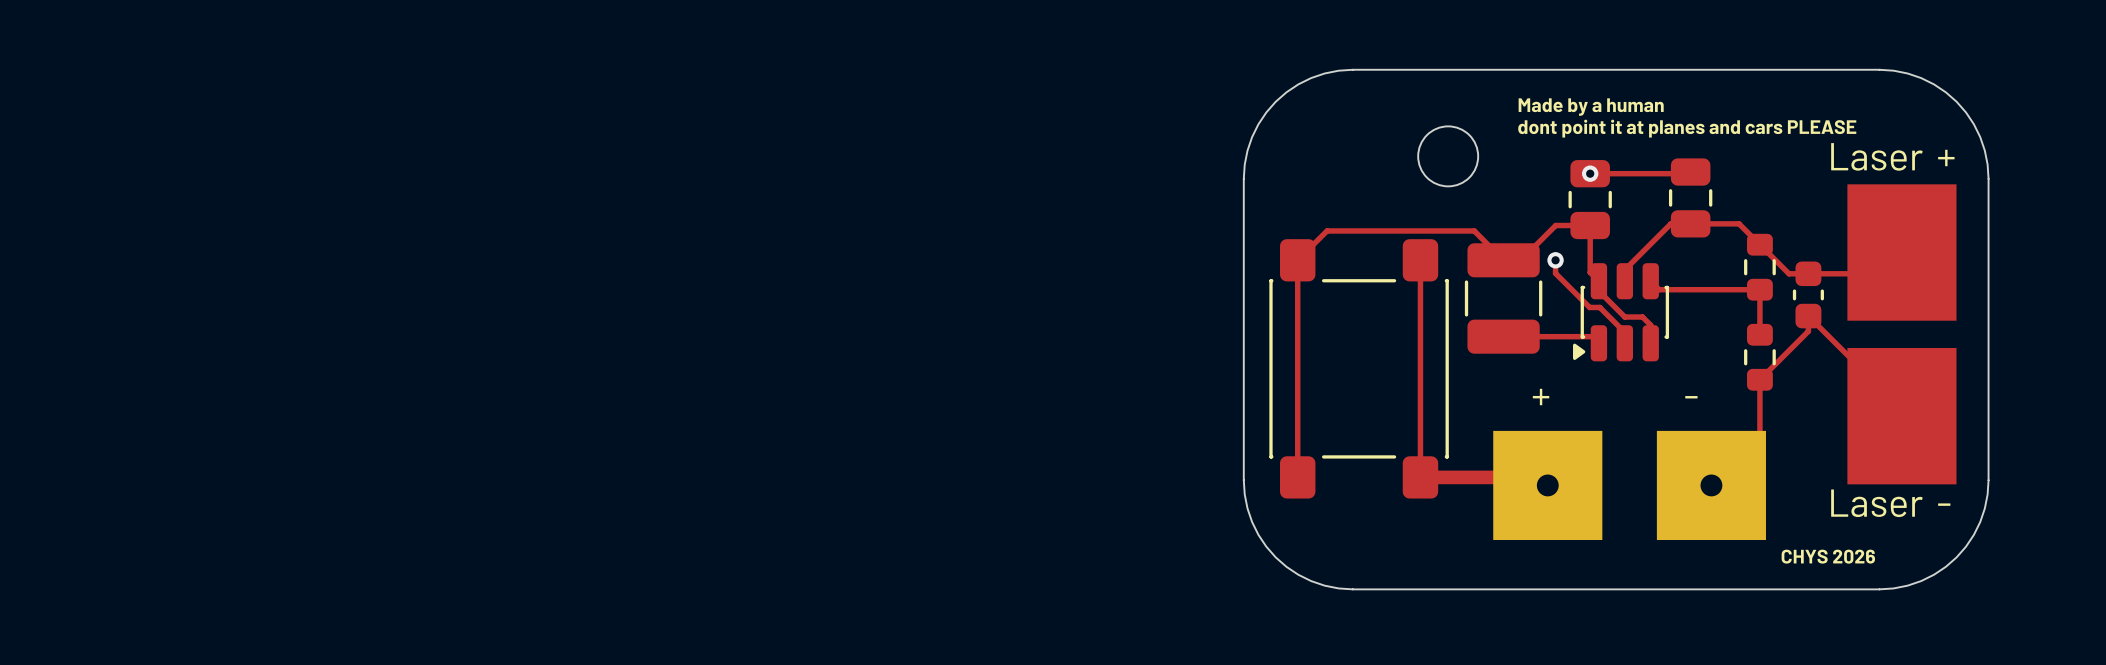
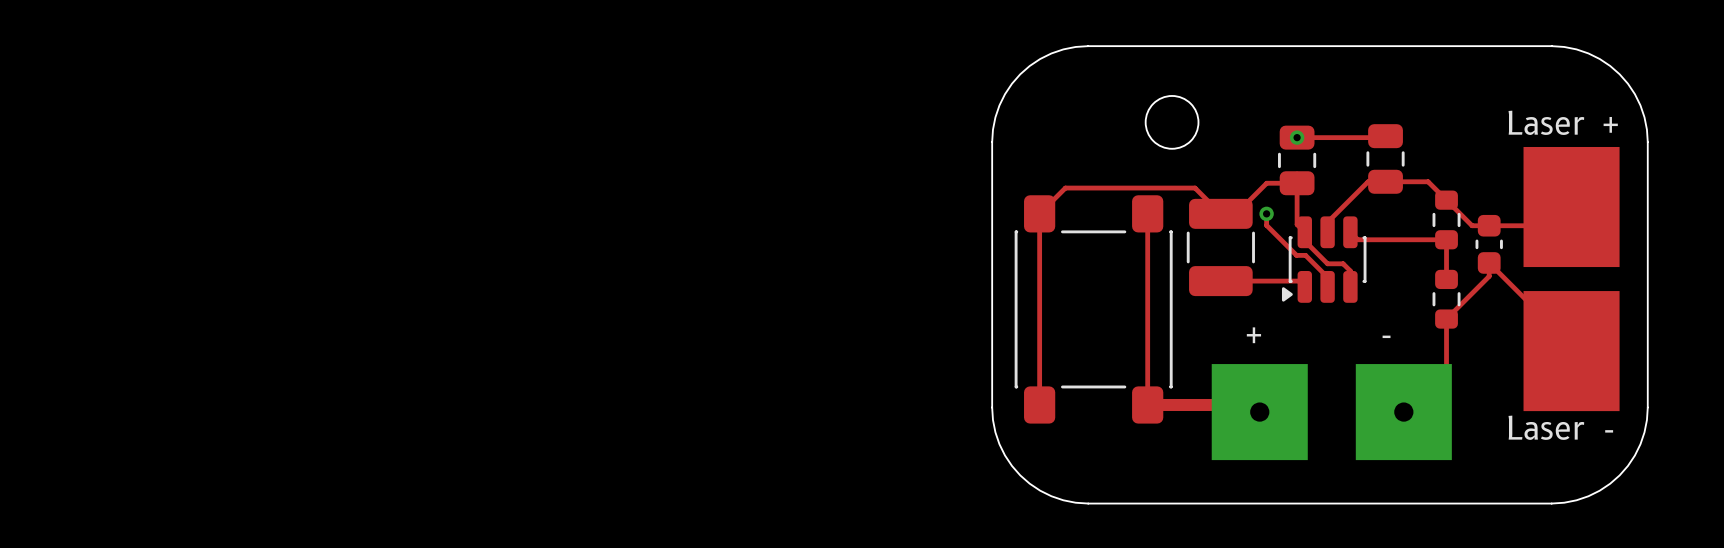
text: Made by a human (1591, 107) -> none
text: dont point it at planes and cars PLEASE (1687, 128) -> none
text: CHYS 2026 (1828, 556) -> none

